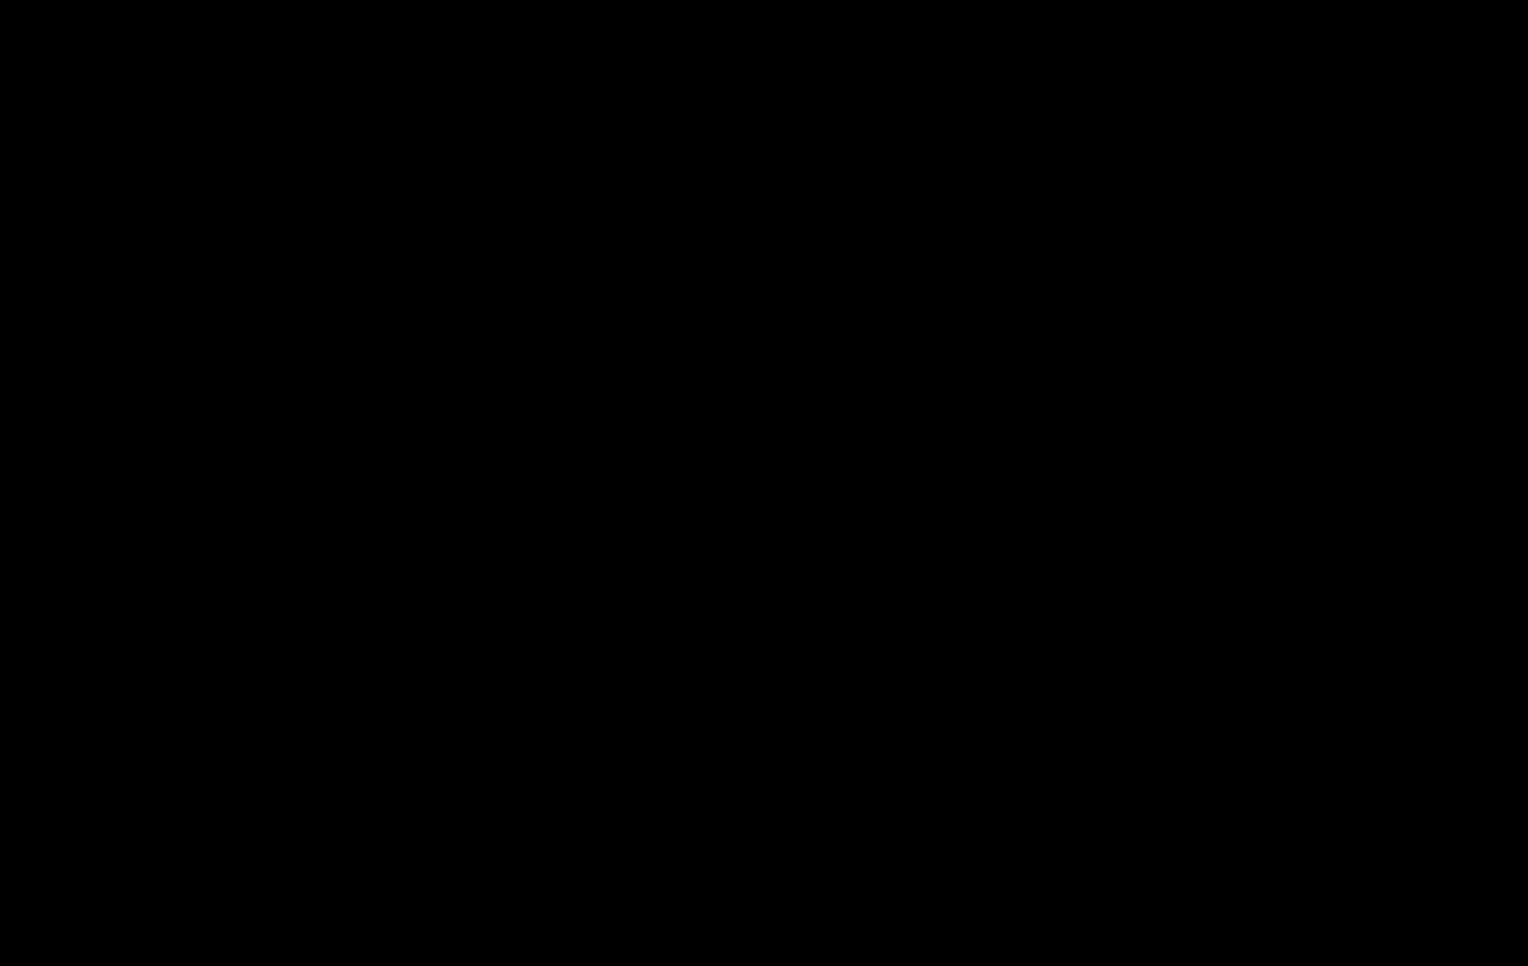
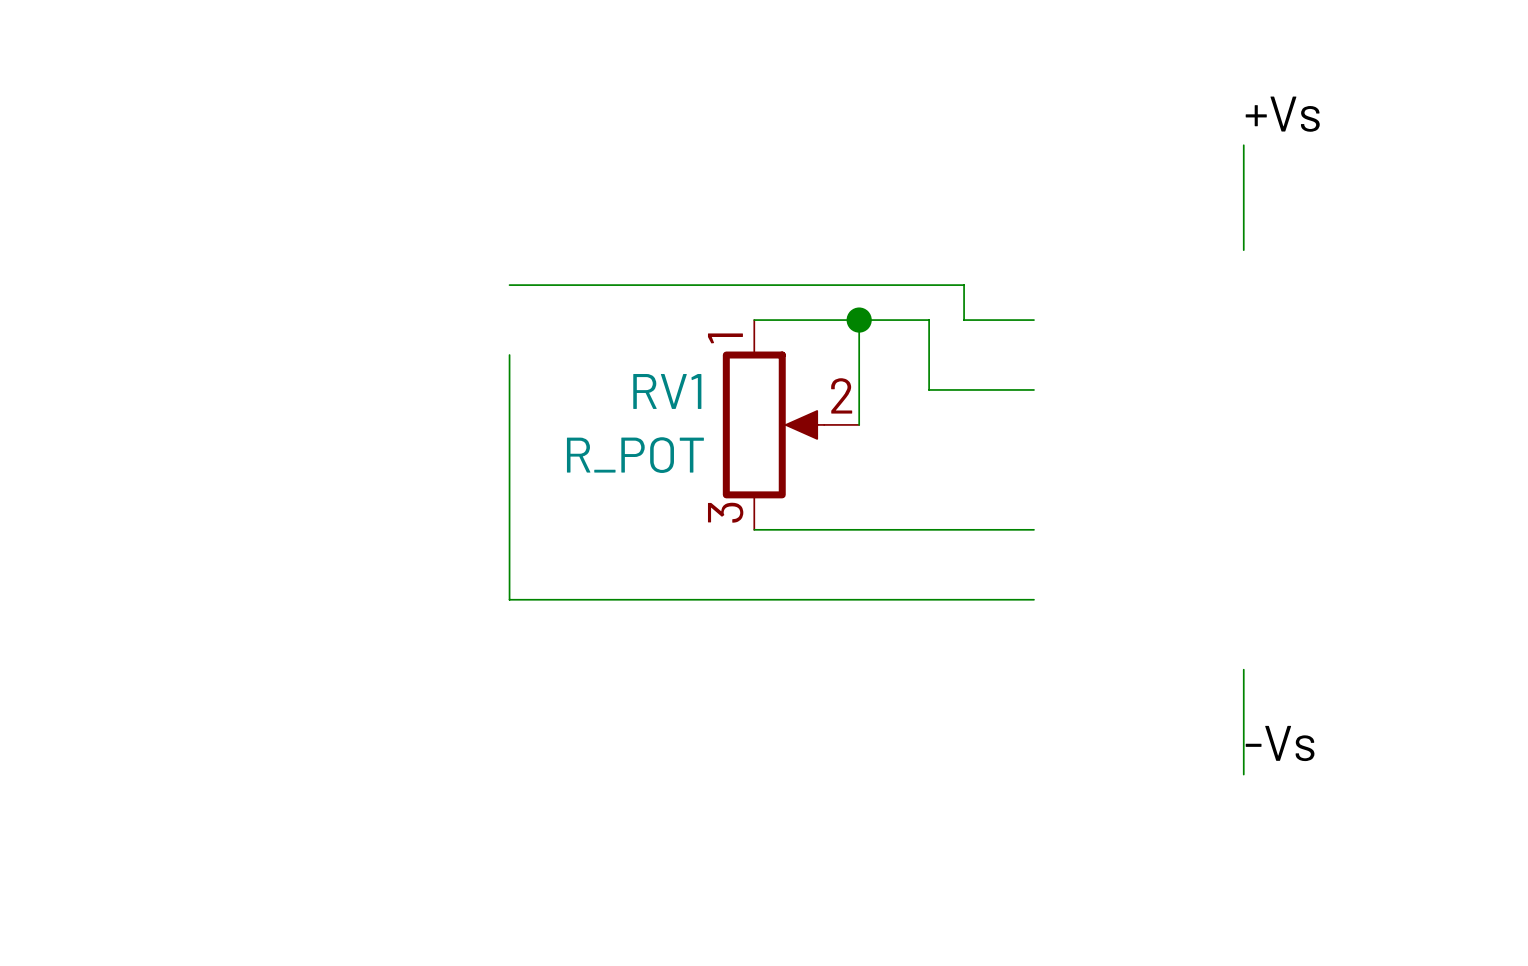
label: none -> +Vs (1282, 114)
wire: none -> (1243, 145) (1243, 250)
wire: none -> (509, 285) (964, 285) (964, 320) (1033, 320)
wire: none -> (754, 320) (929, 320) (929, 389) (1033, 389)
wire: none -> (859, 320) (859, 424)
junction: none -> (859, 320)
wire: none -> (509, 355) (509, 599) (1033, 599)
RV1: none -> R_POT (790, 424)
wire: none -> (754, 529) (1033, 529)
wire: none -> (1243, 669) (1243, 774)
label: none -> -Vs (1280, 743)

